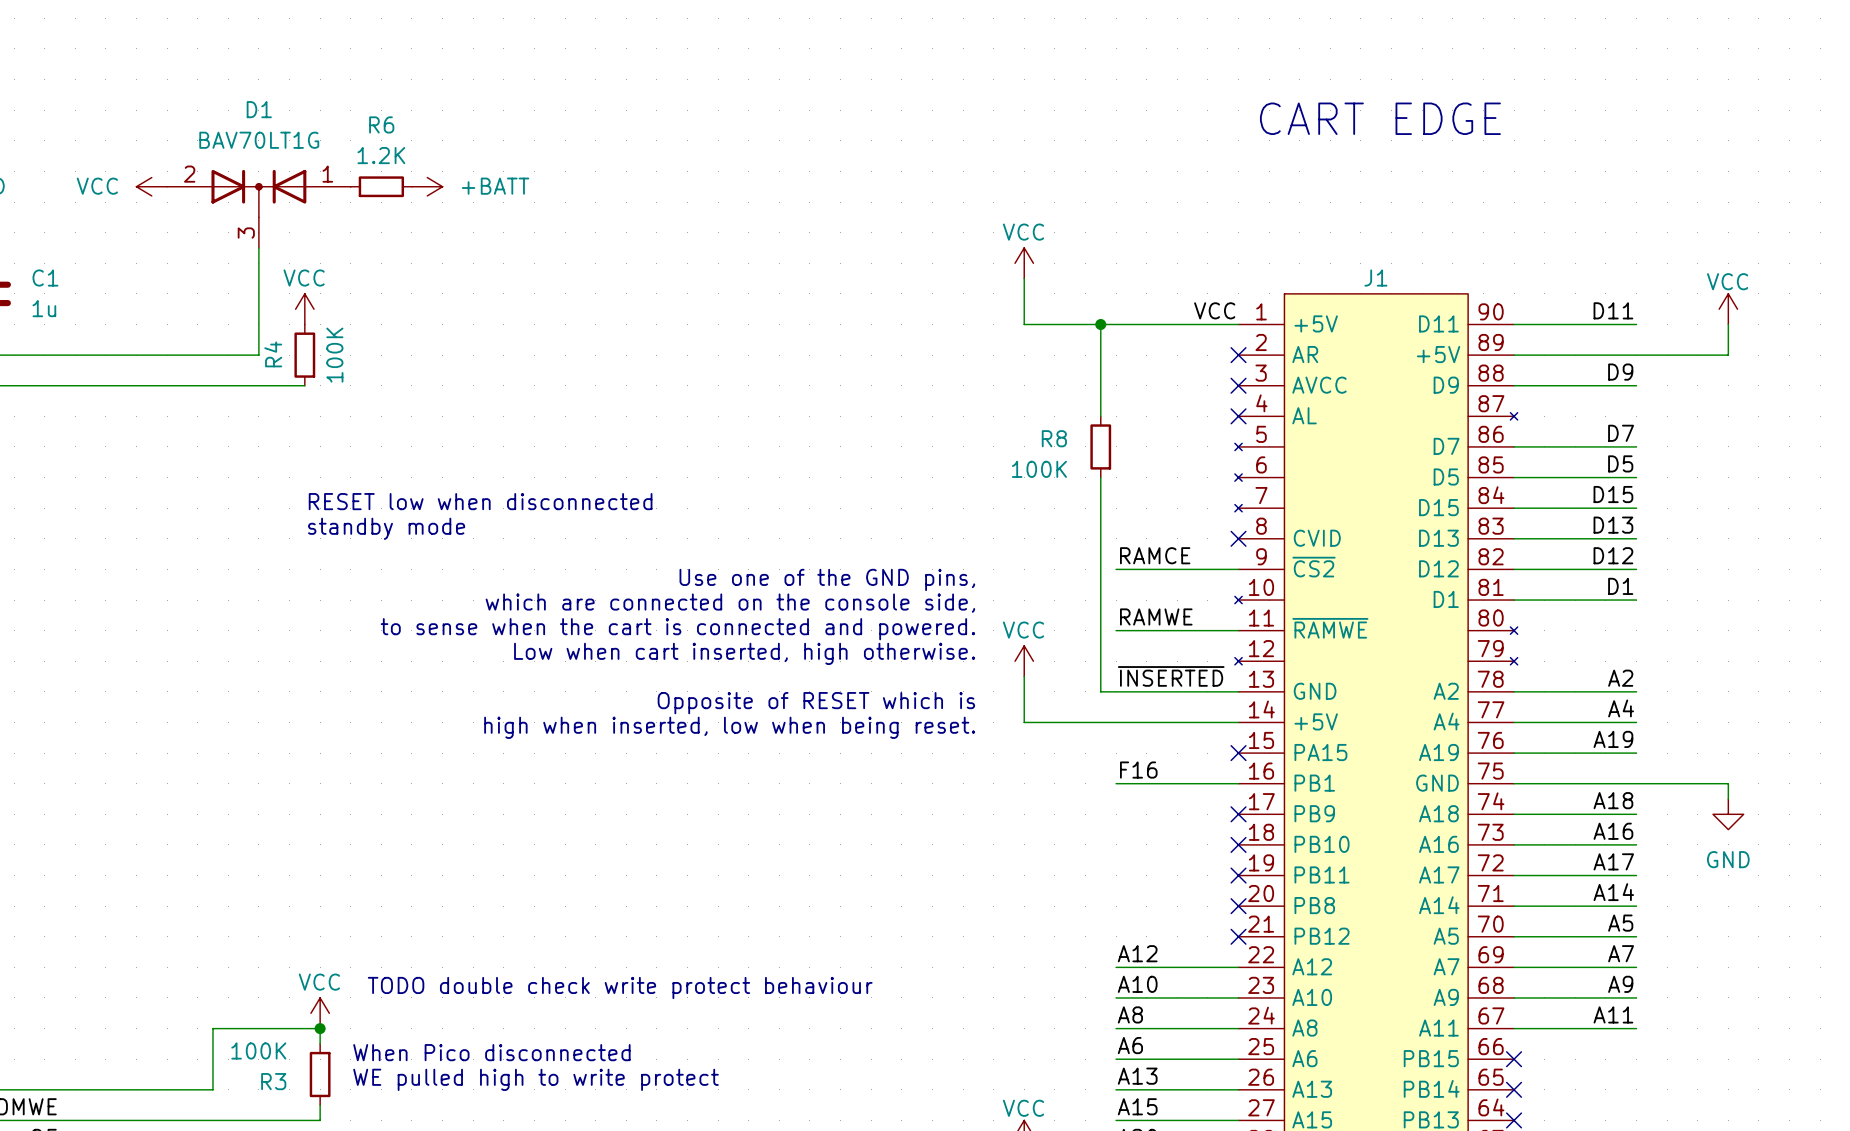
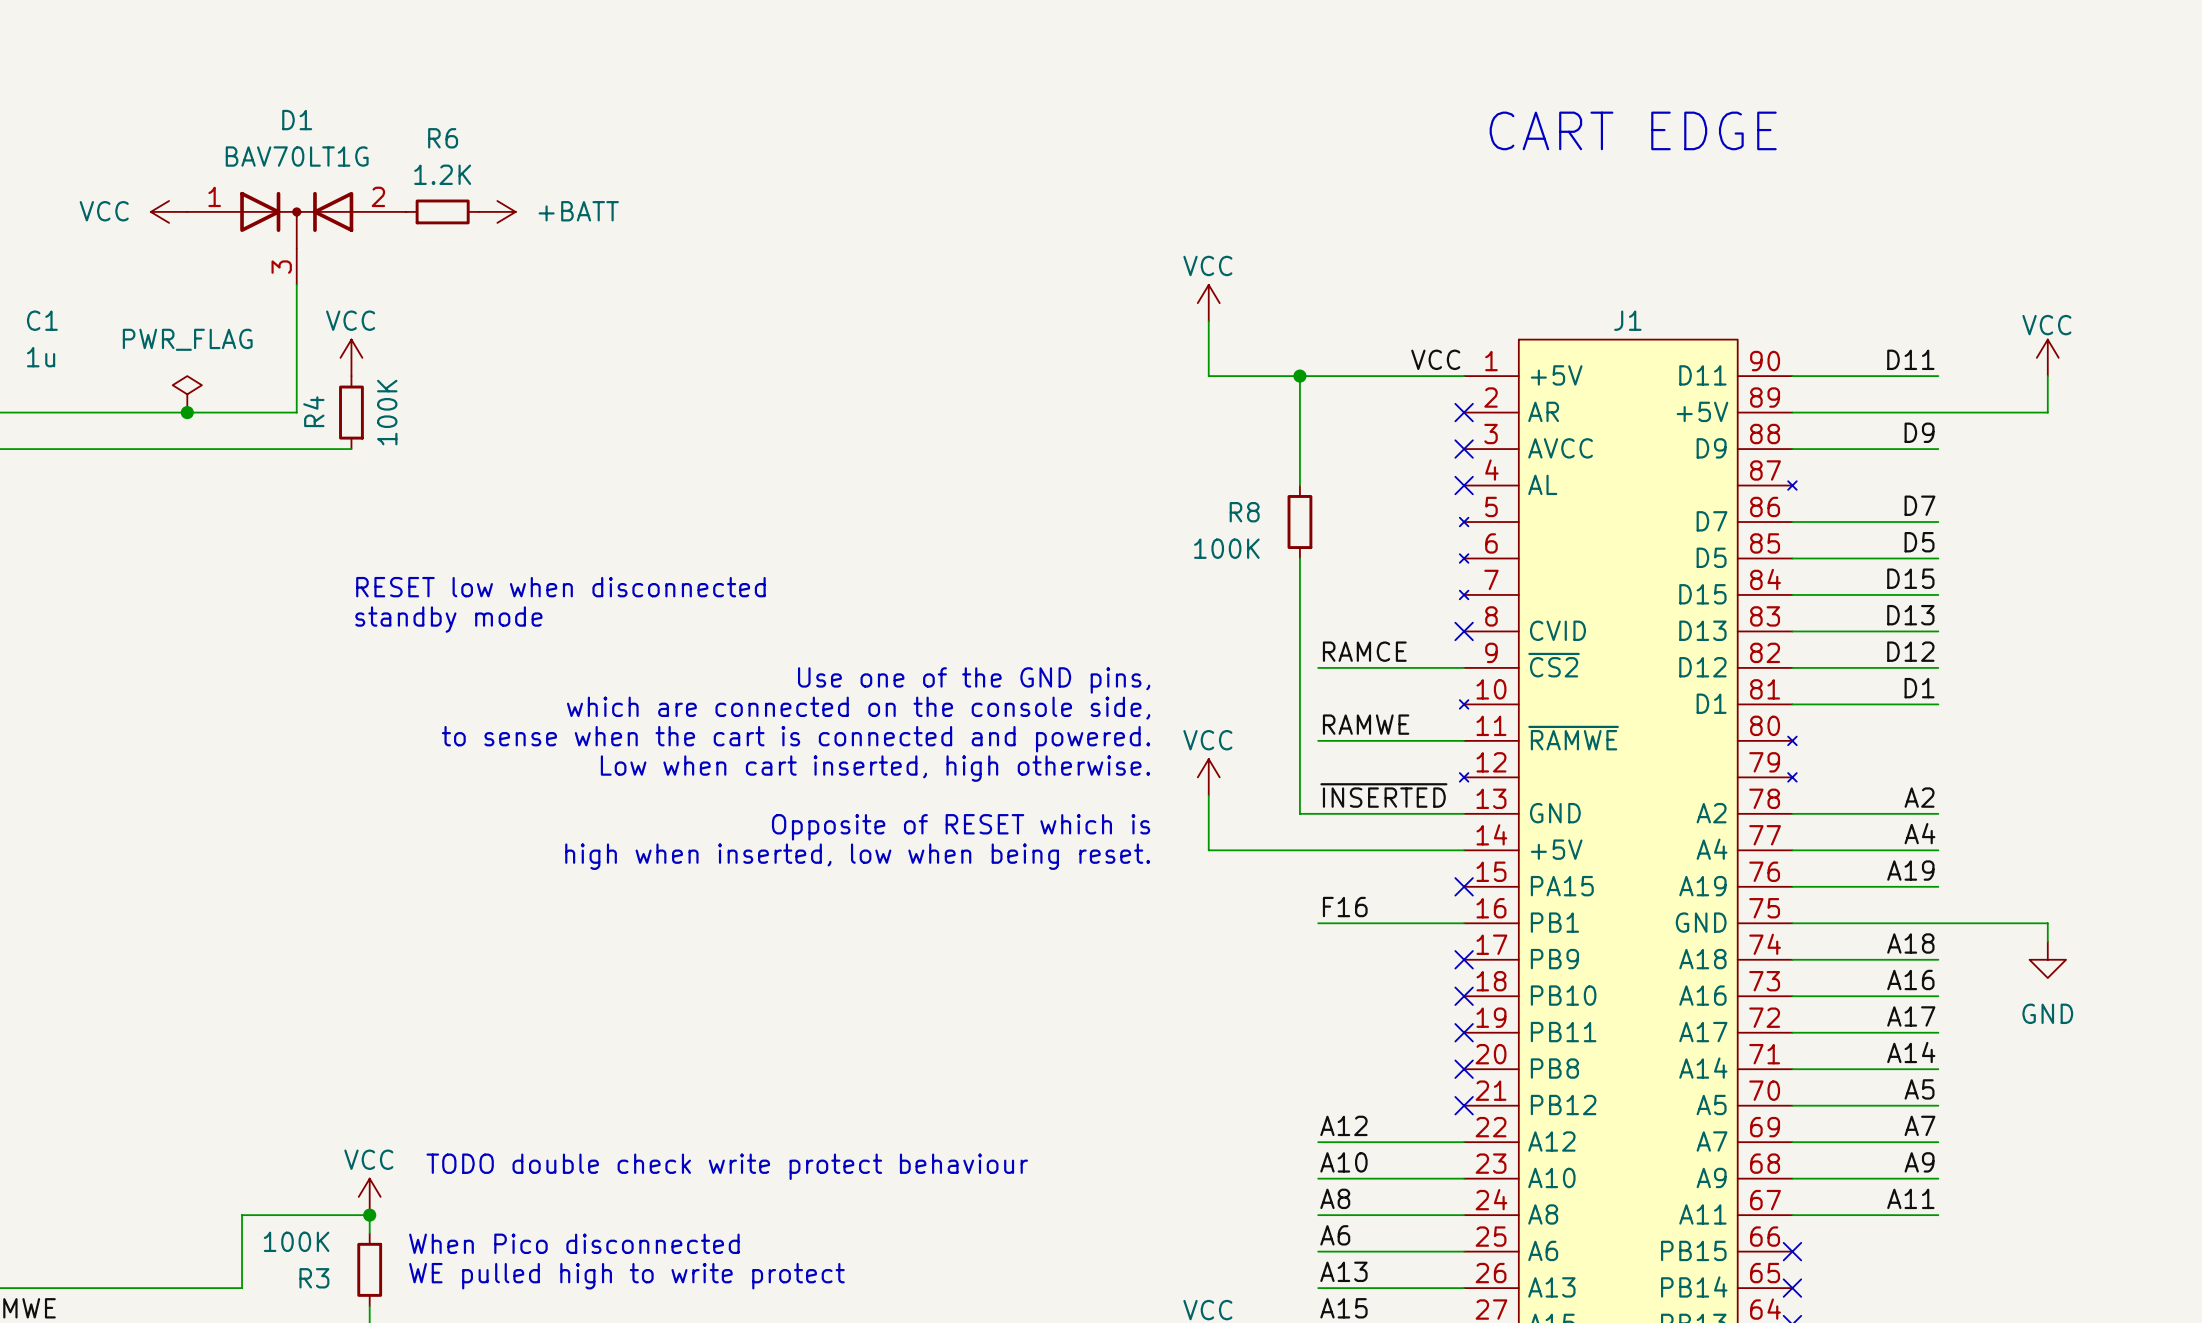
D1 flip: as is (258, 193) -> left-right (296, 220)
power symbol: none -> PWR_FLAG (187, 394)
junction: none -> (187, 412)

